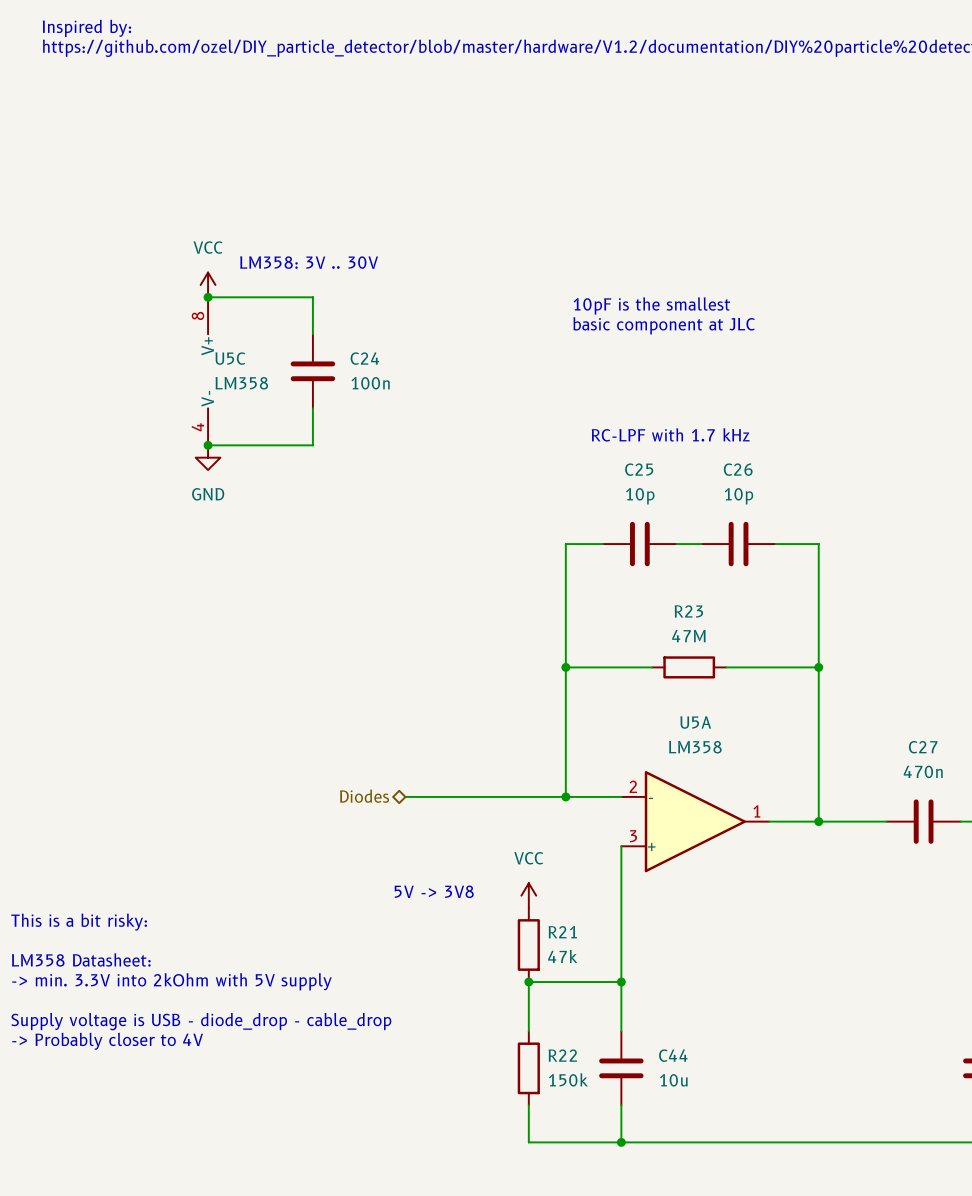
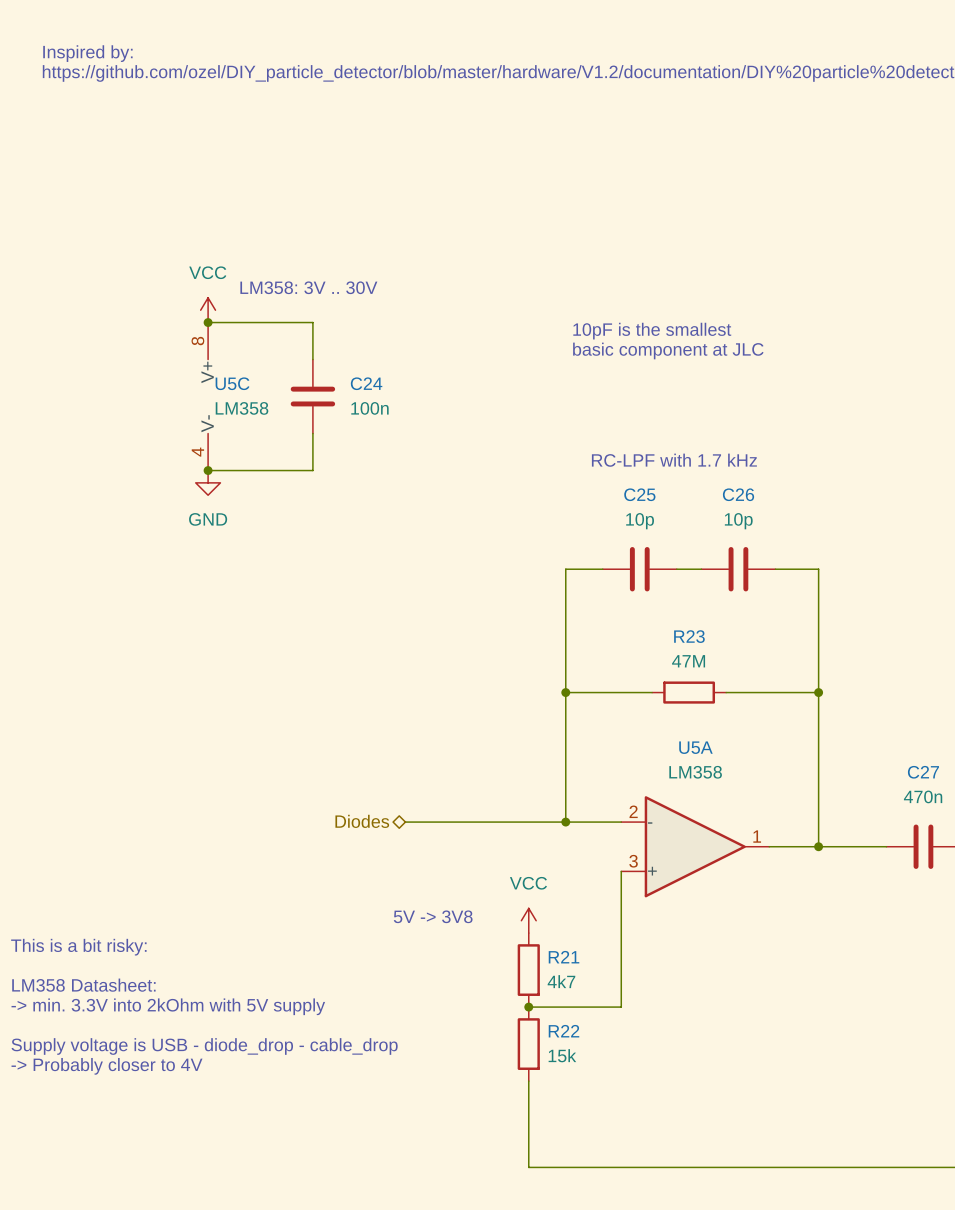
R21 value: 47k (562, 956) -> 4k7 (561, 981)
wire: (528, 982) (528, 1031) -> (528, 1081) (528, 1130)
wire: (621, 982) (621, 1031) -> none
junction: (621, 982) -> none
R22 position: (528, 1068) -> (528, 1044)
C44: 10u (621, 1068) -> none
R22 value: 150k (568, 1079) -> 15k (562, 1055)
wire: (621, 1105) (621, 1142) -> none
junction: (621, 1142) -> none

